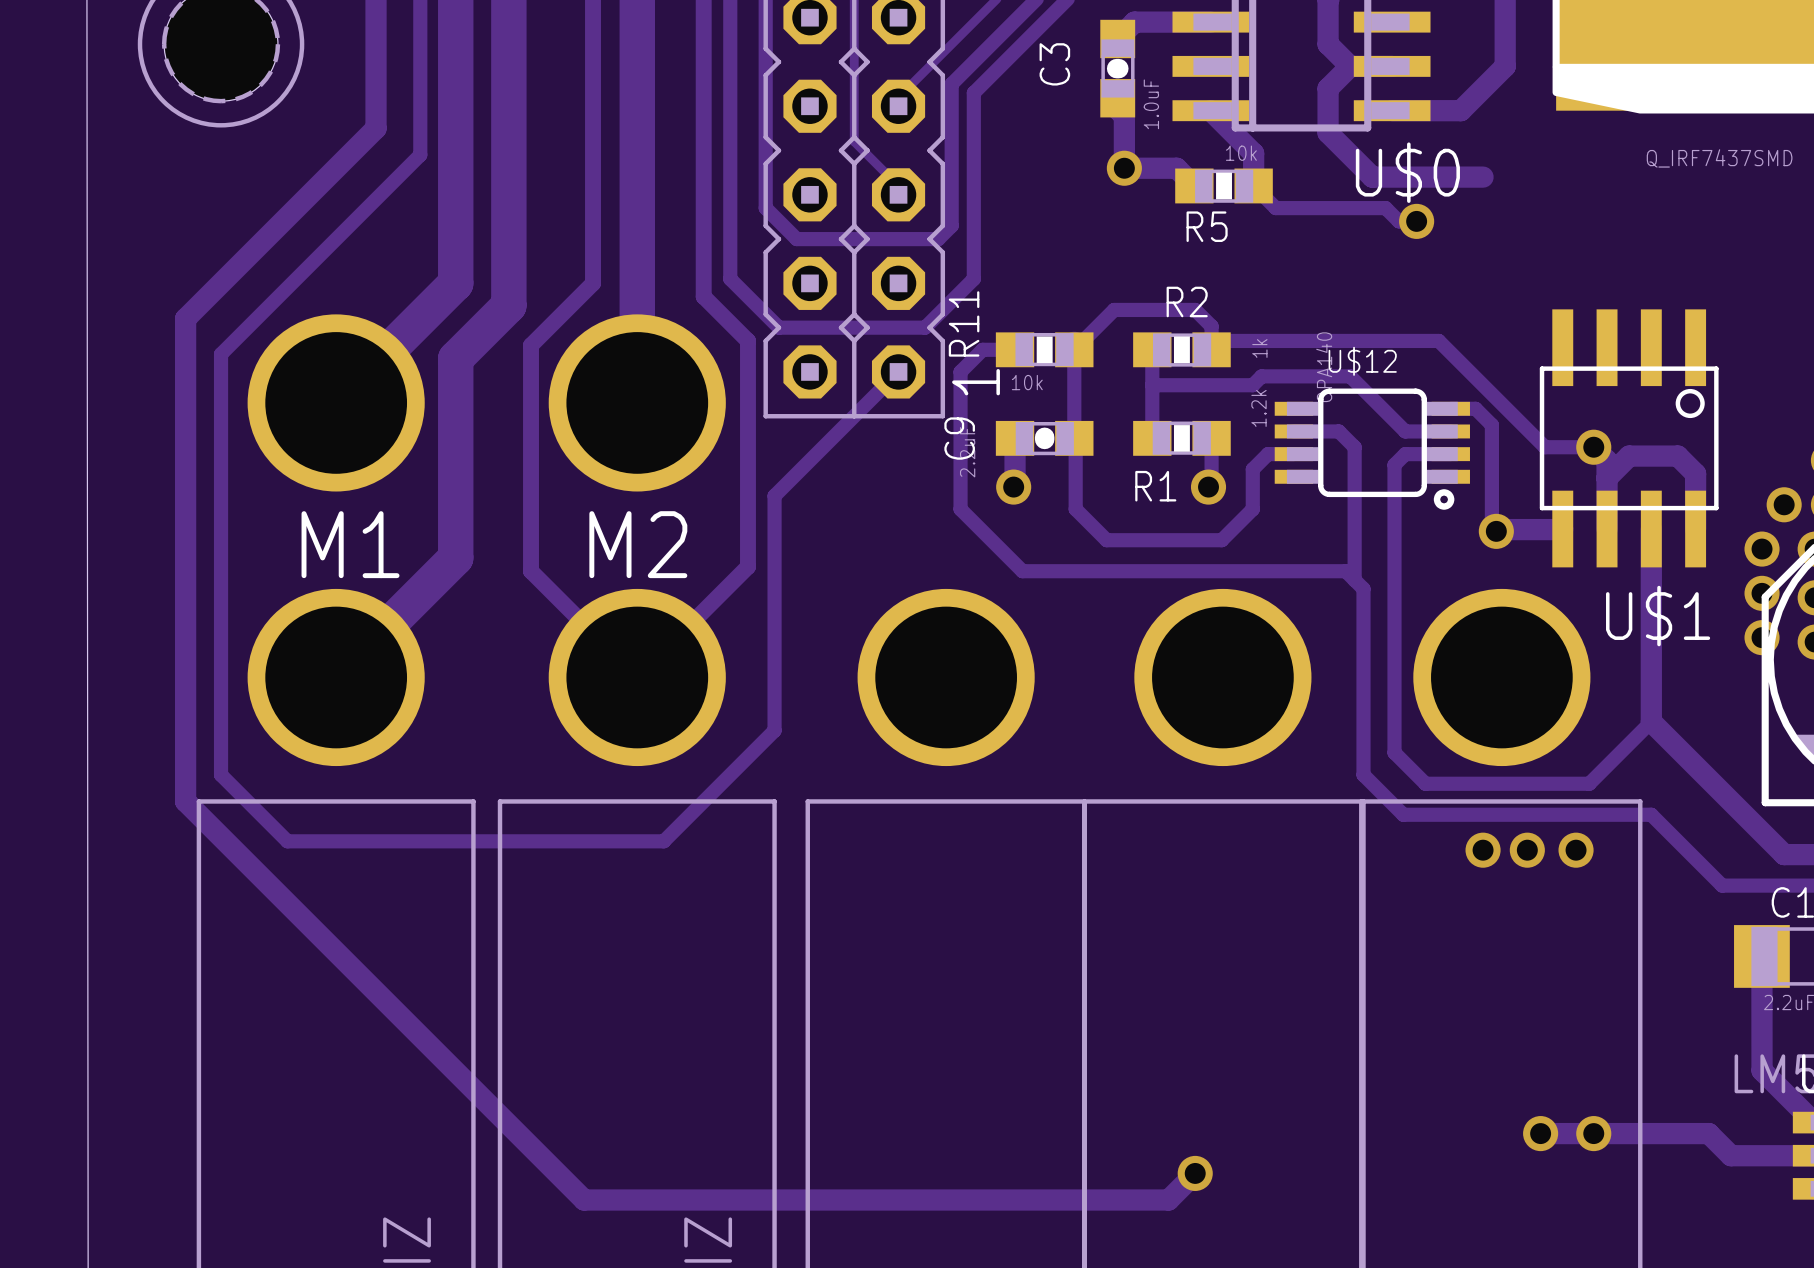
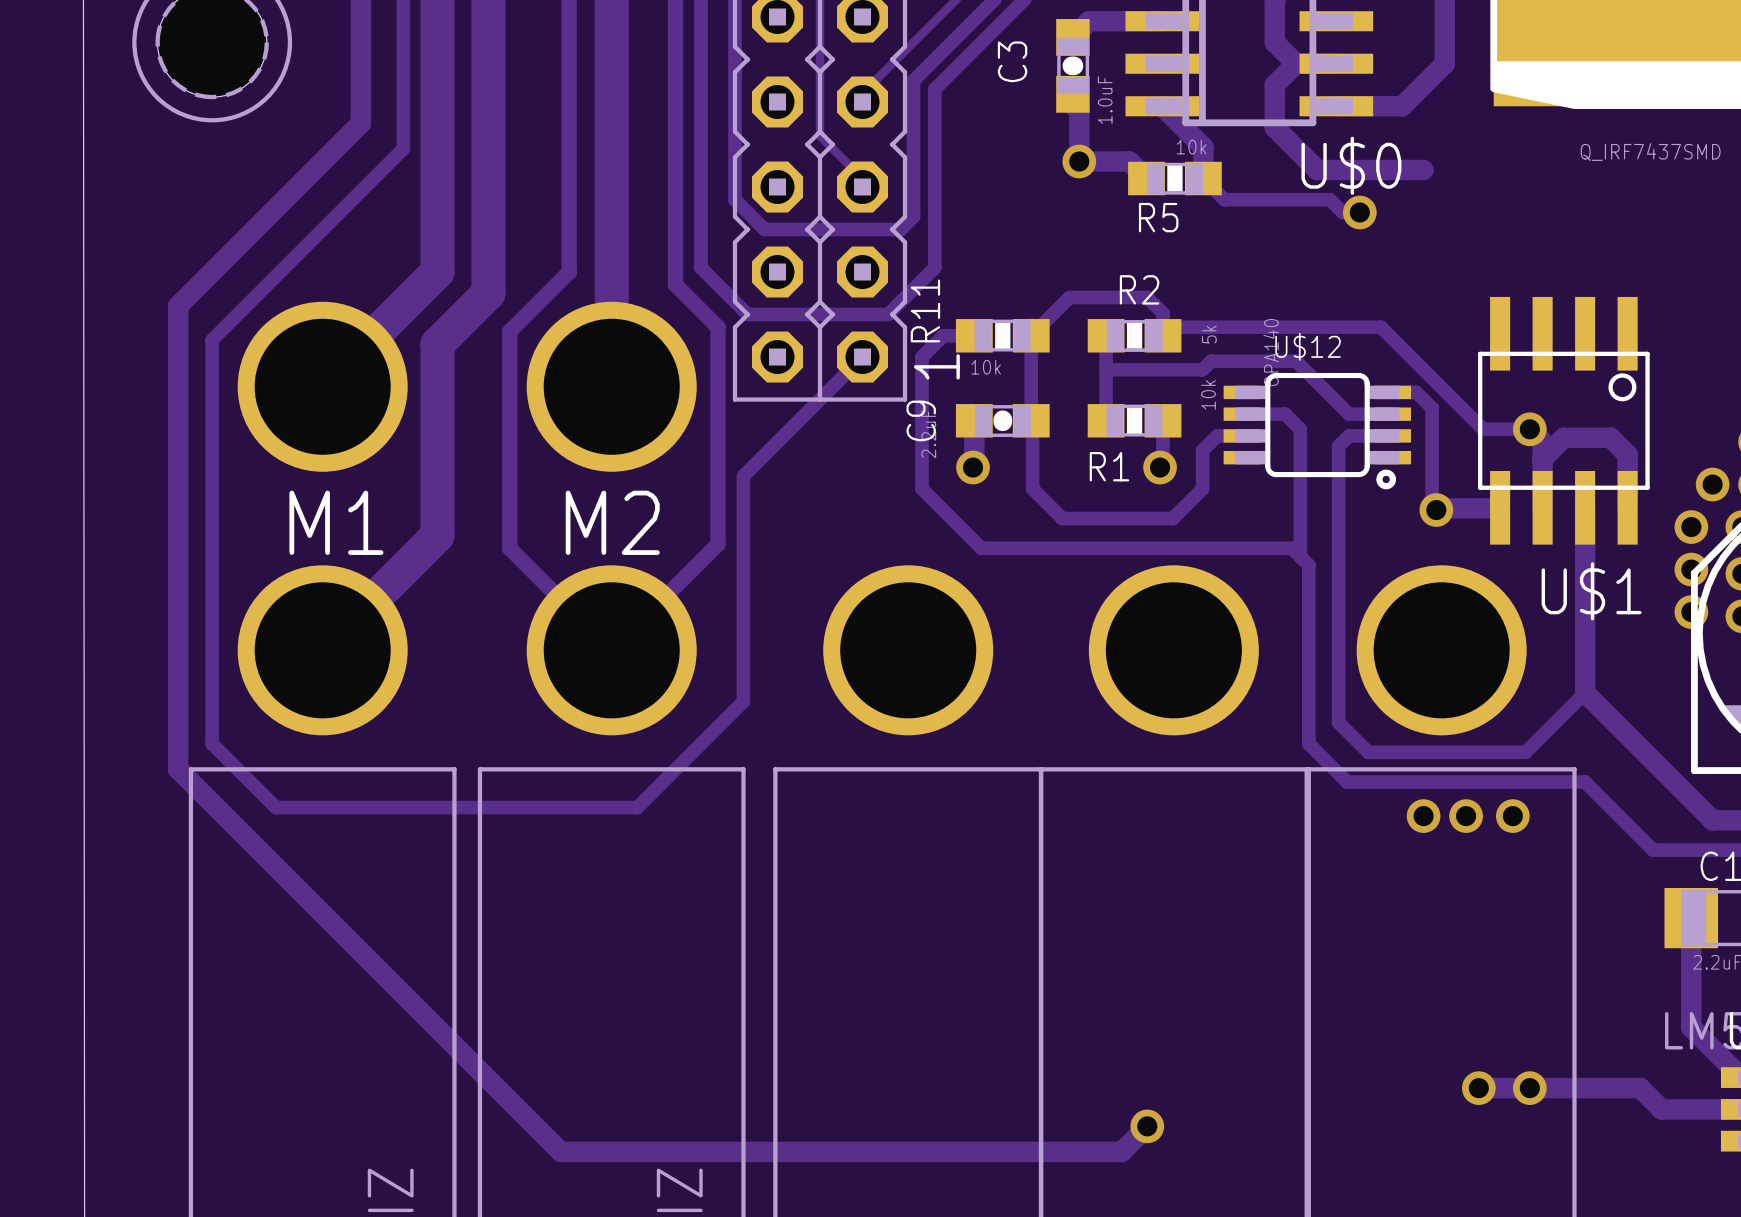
R2 value: 1k (1259, 348) -> 5k (1209, 334)
R1 value: 1.2k (1258, 408) -> 10k (1208, 394)

